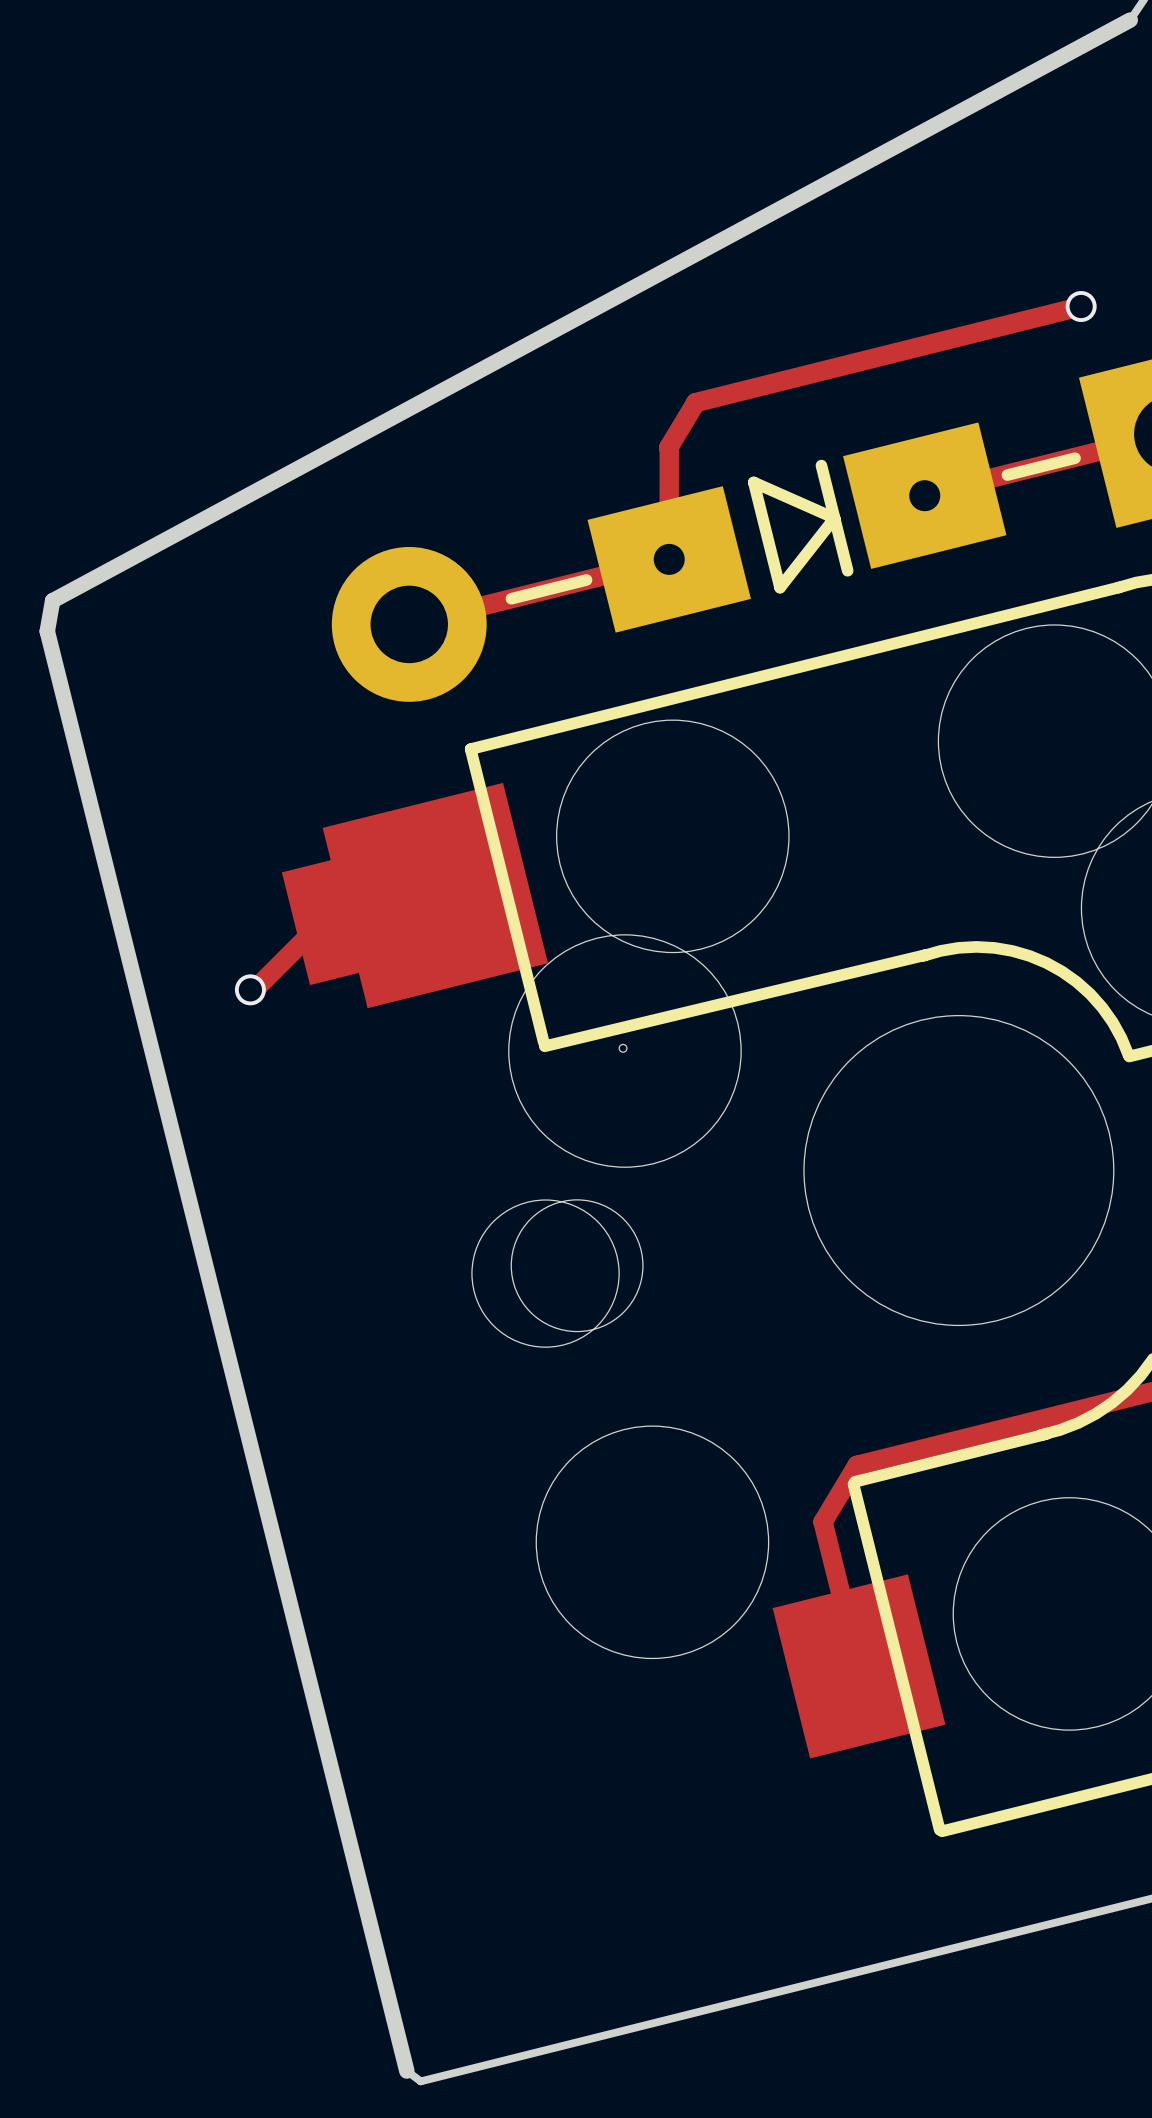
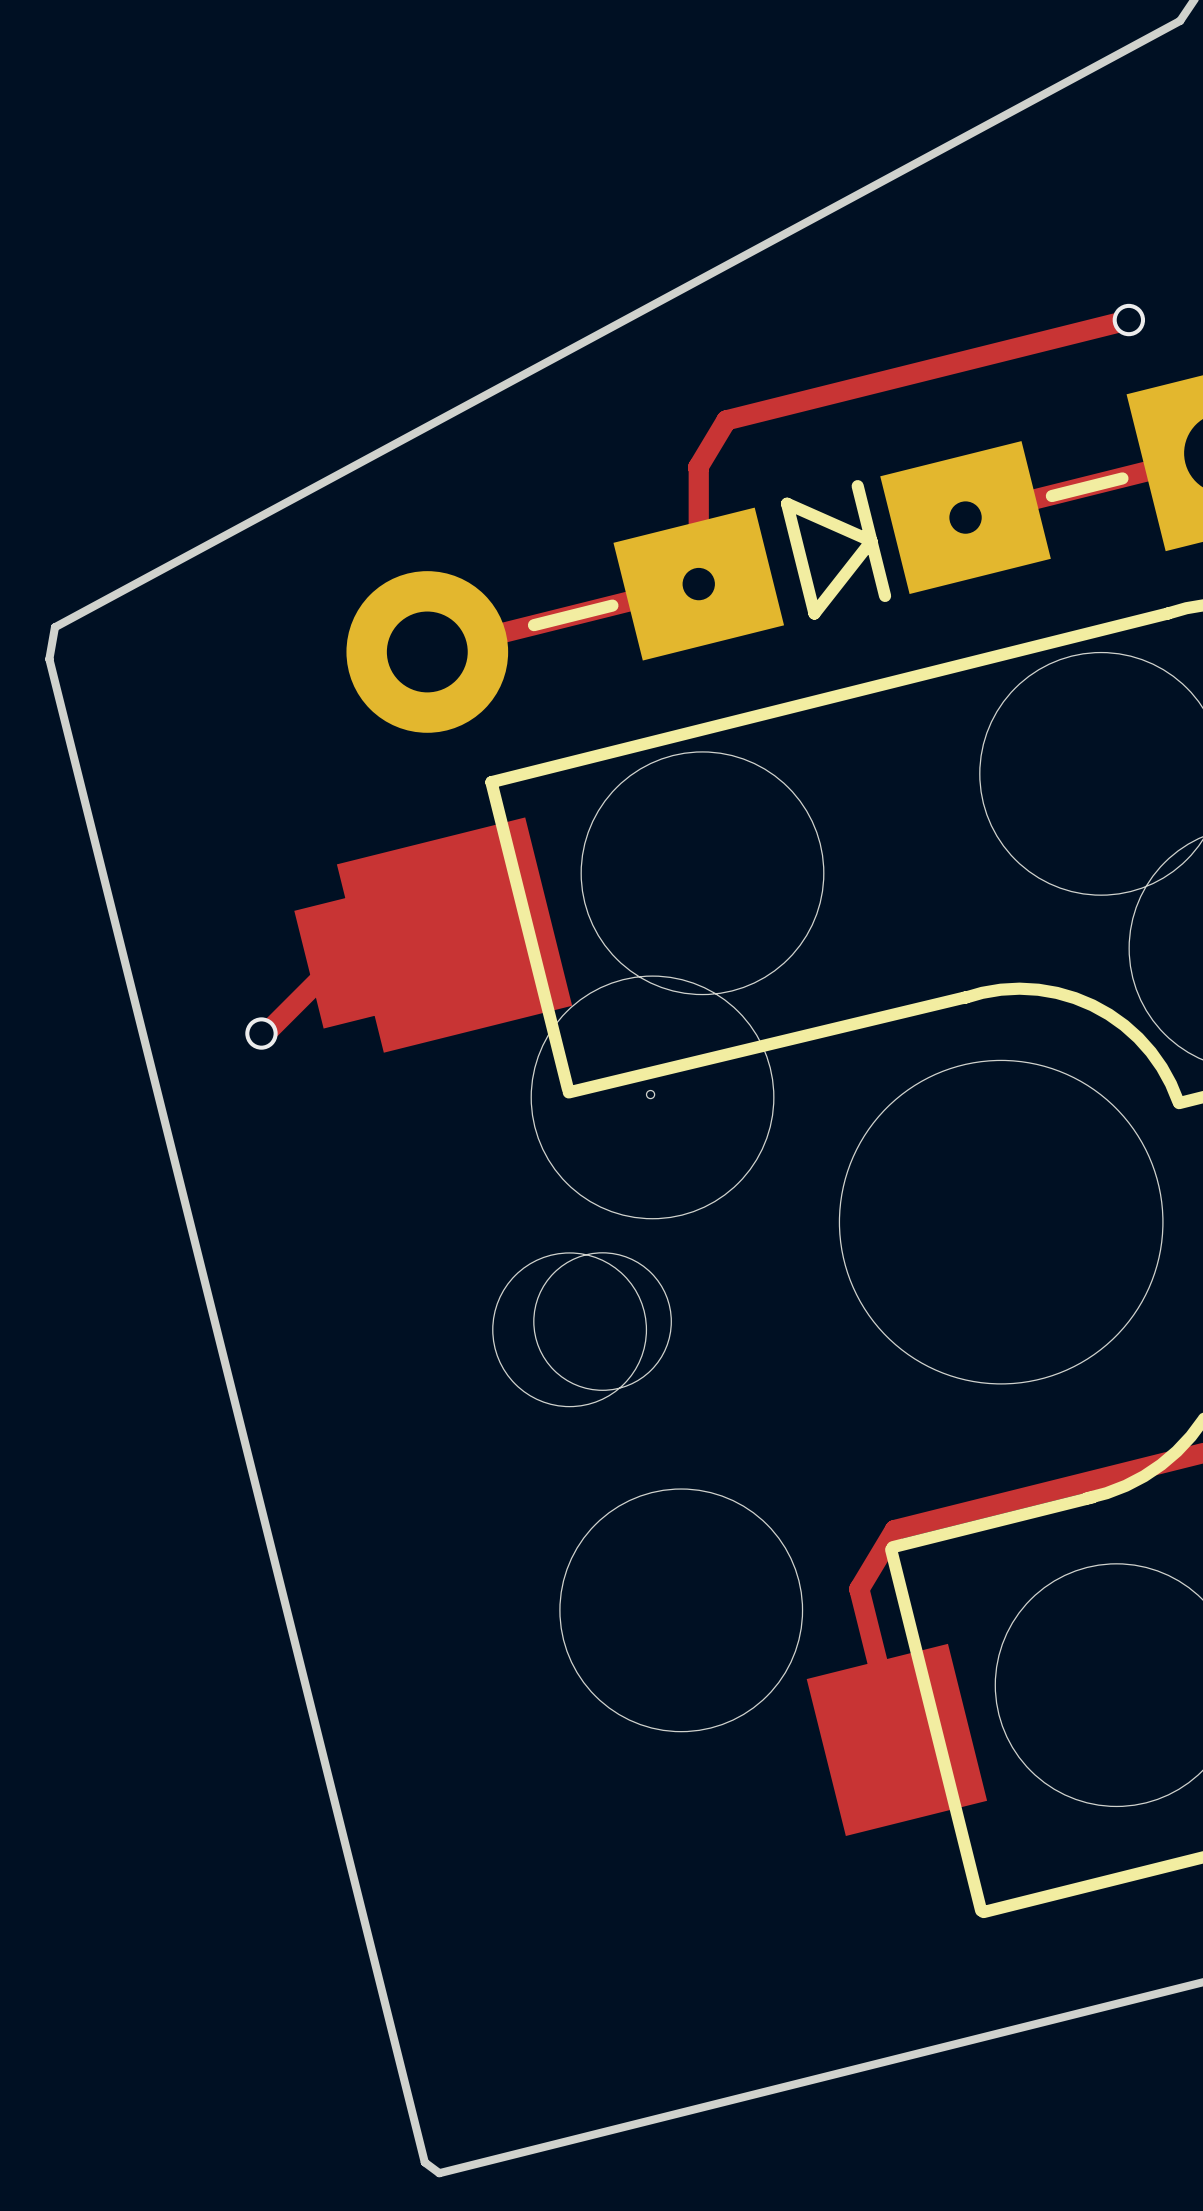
board edge width: thick (1130, 20) (52, 600) (47, 631) (406, 2071) -> thin (1180, 20) (54, 627) (49, 659) (424, 2162)

